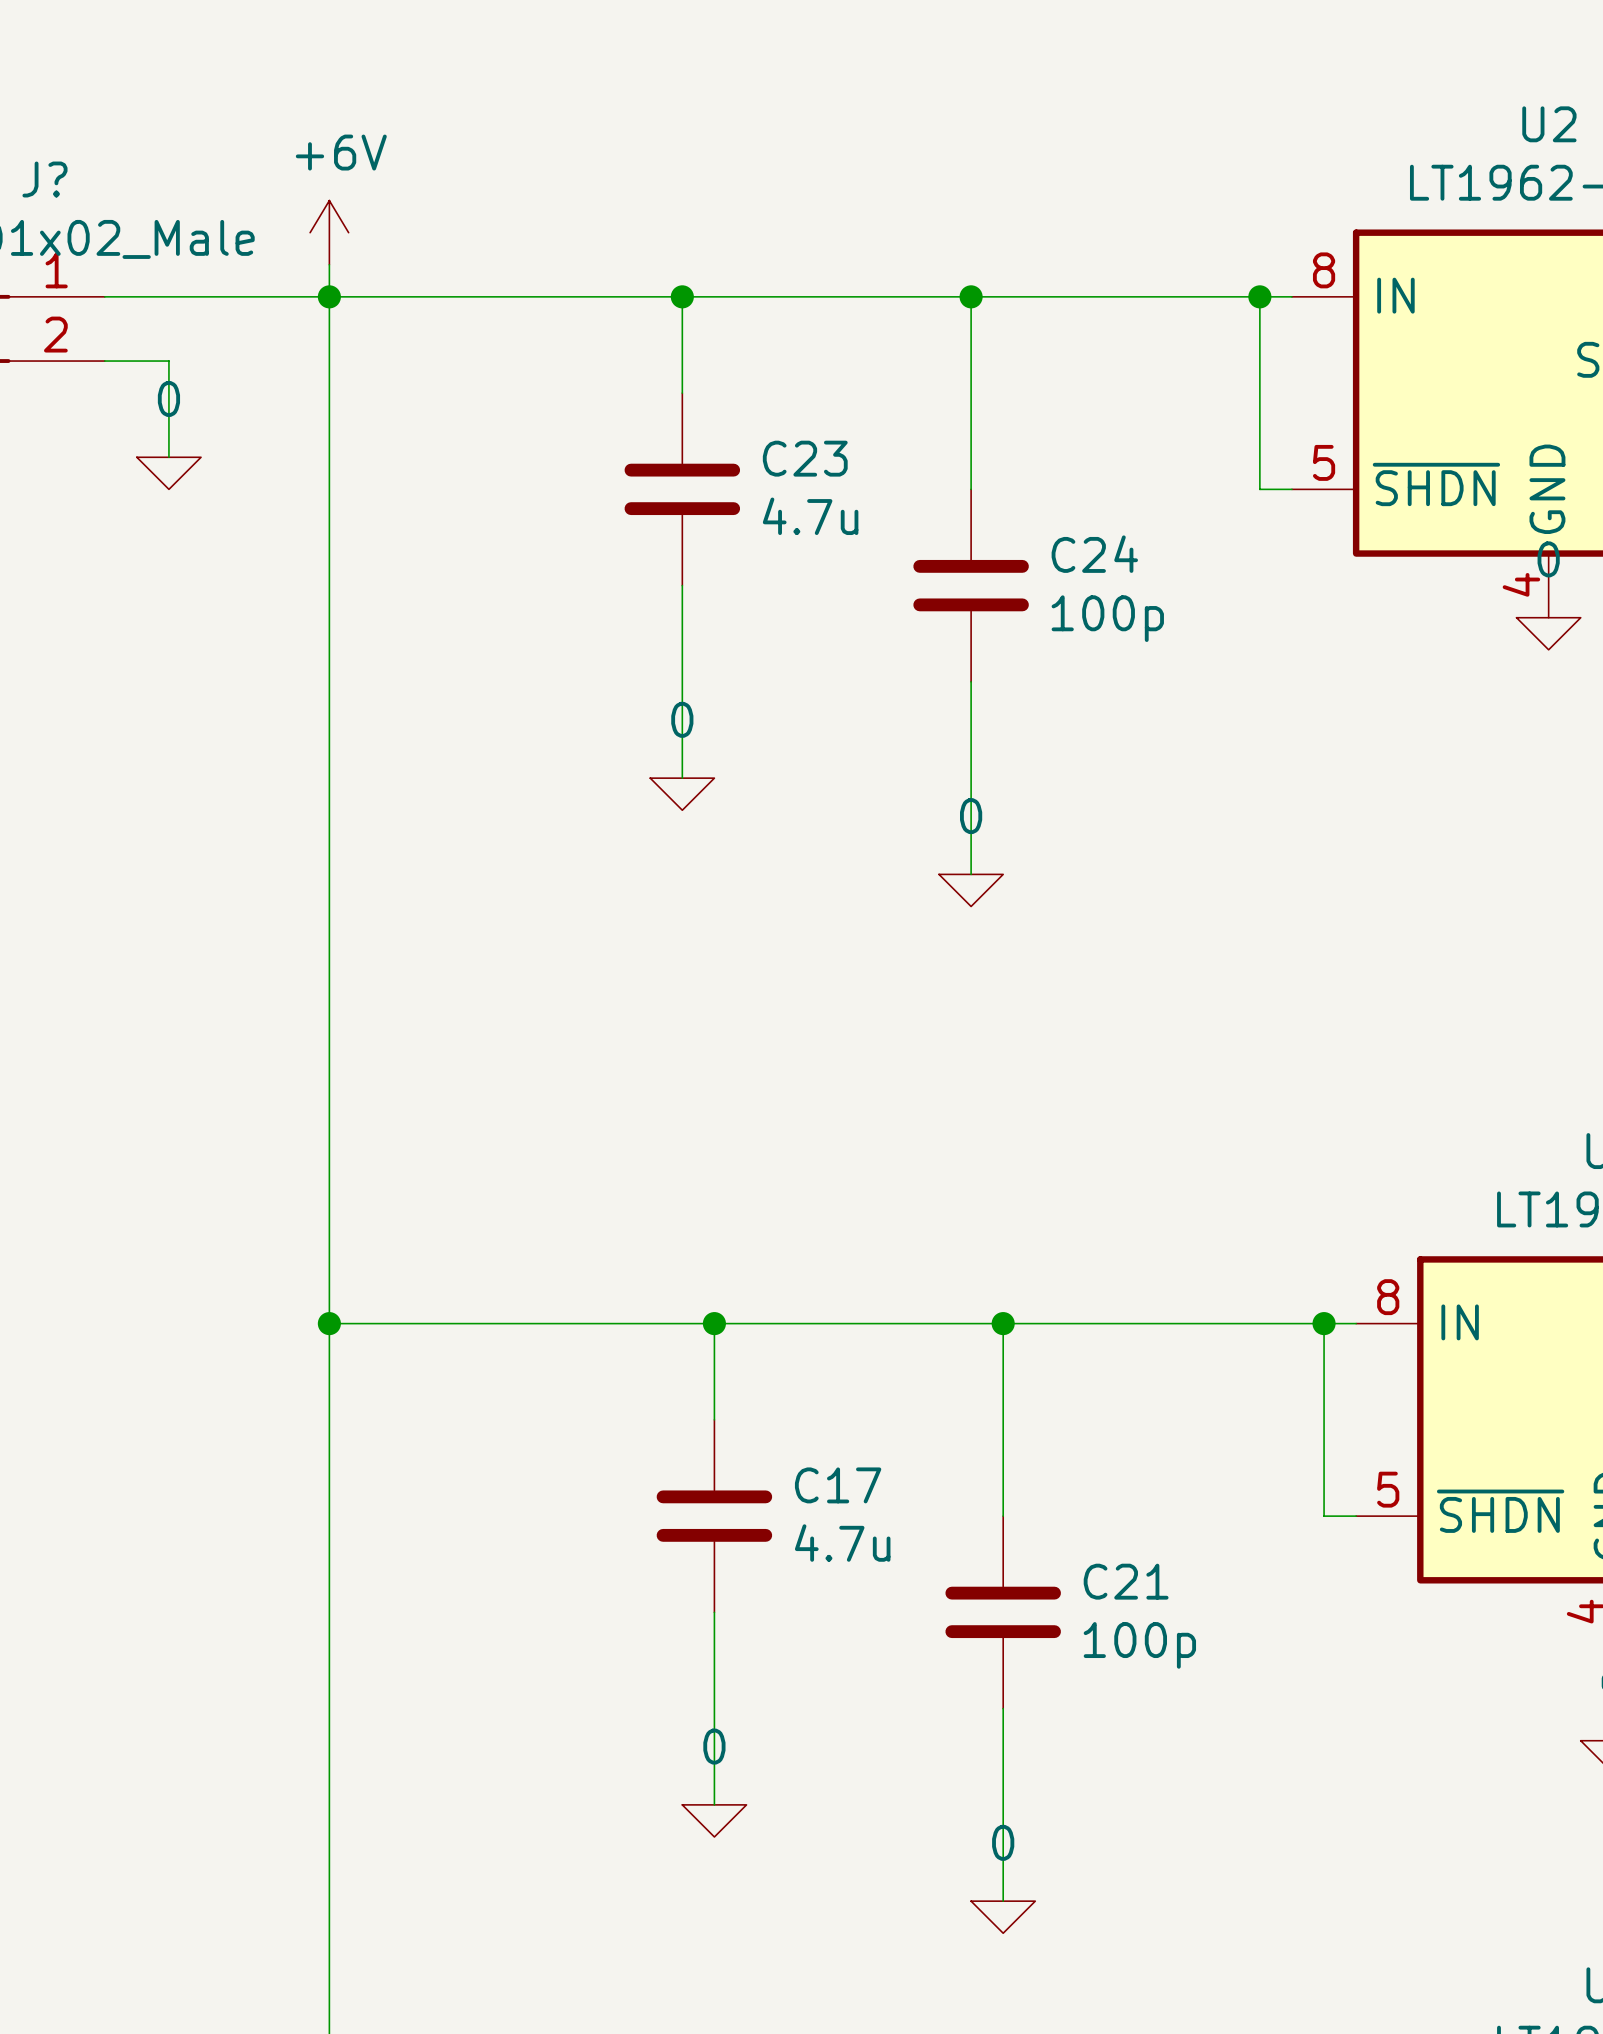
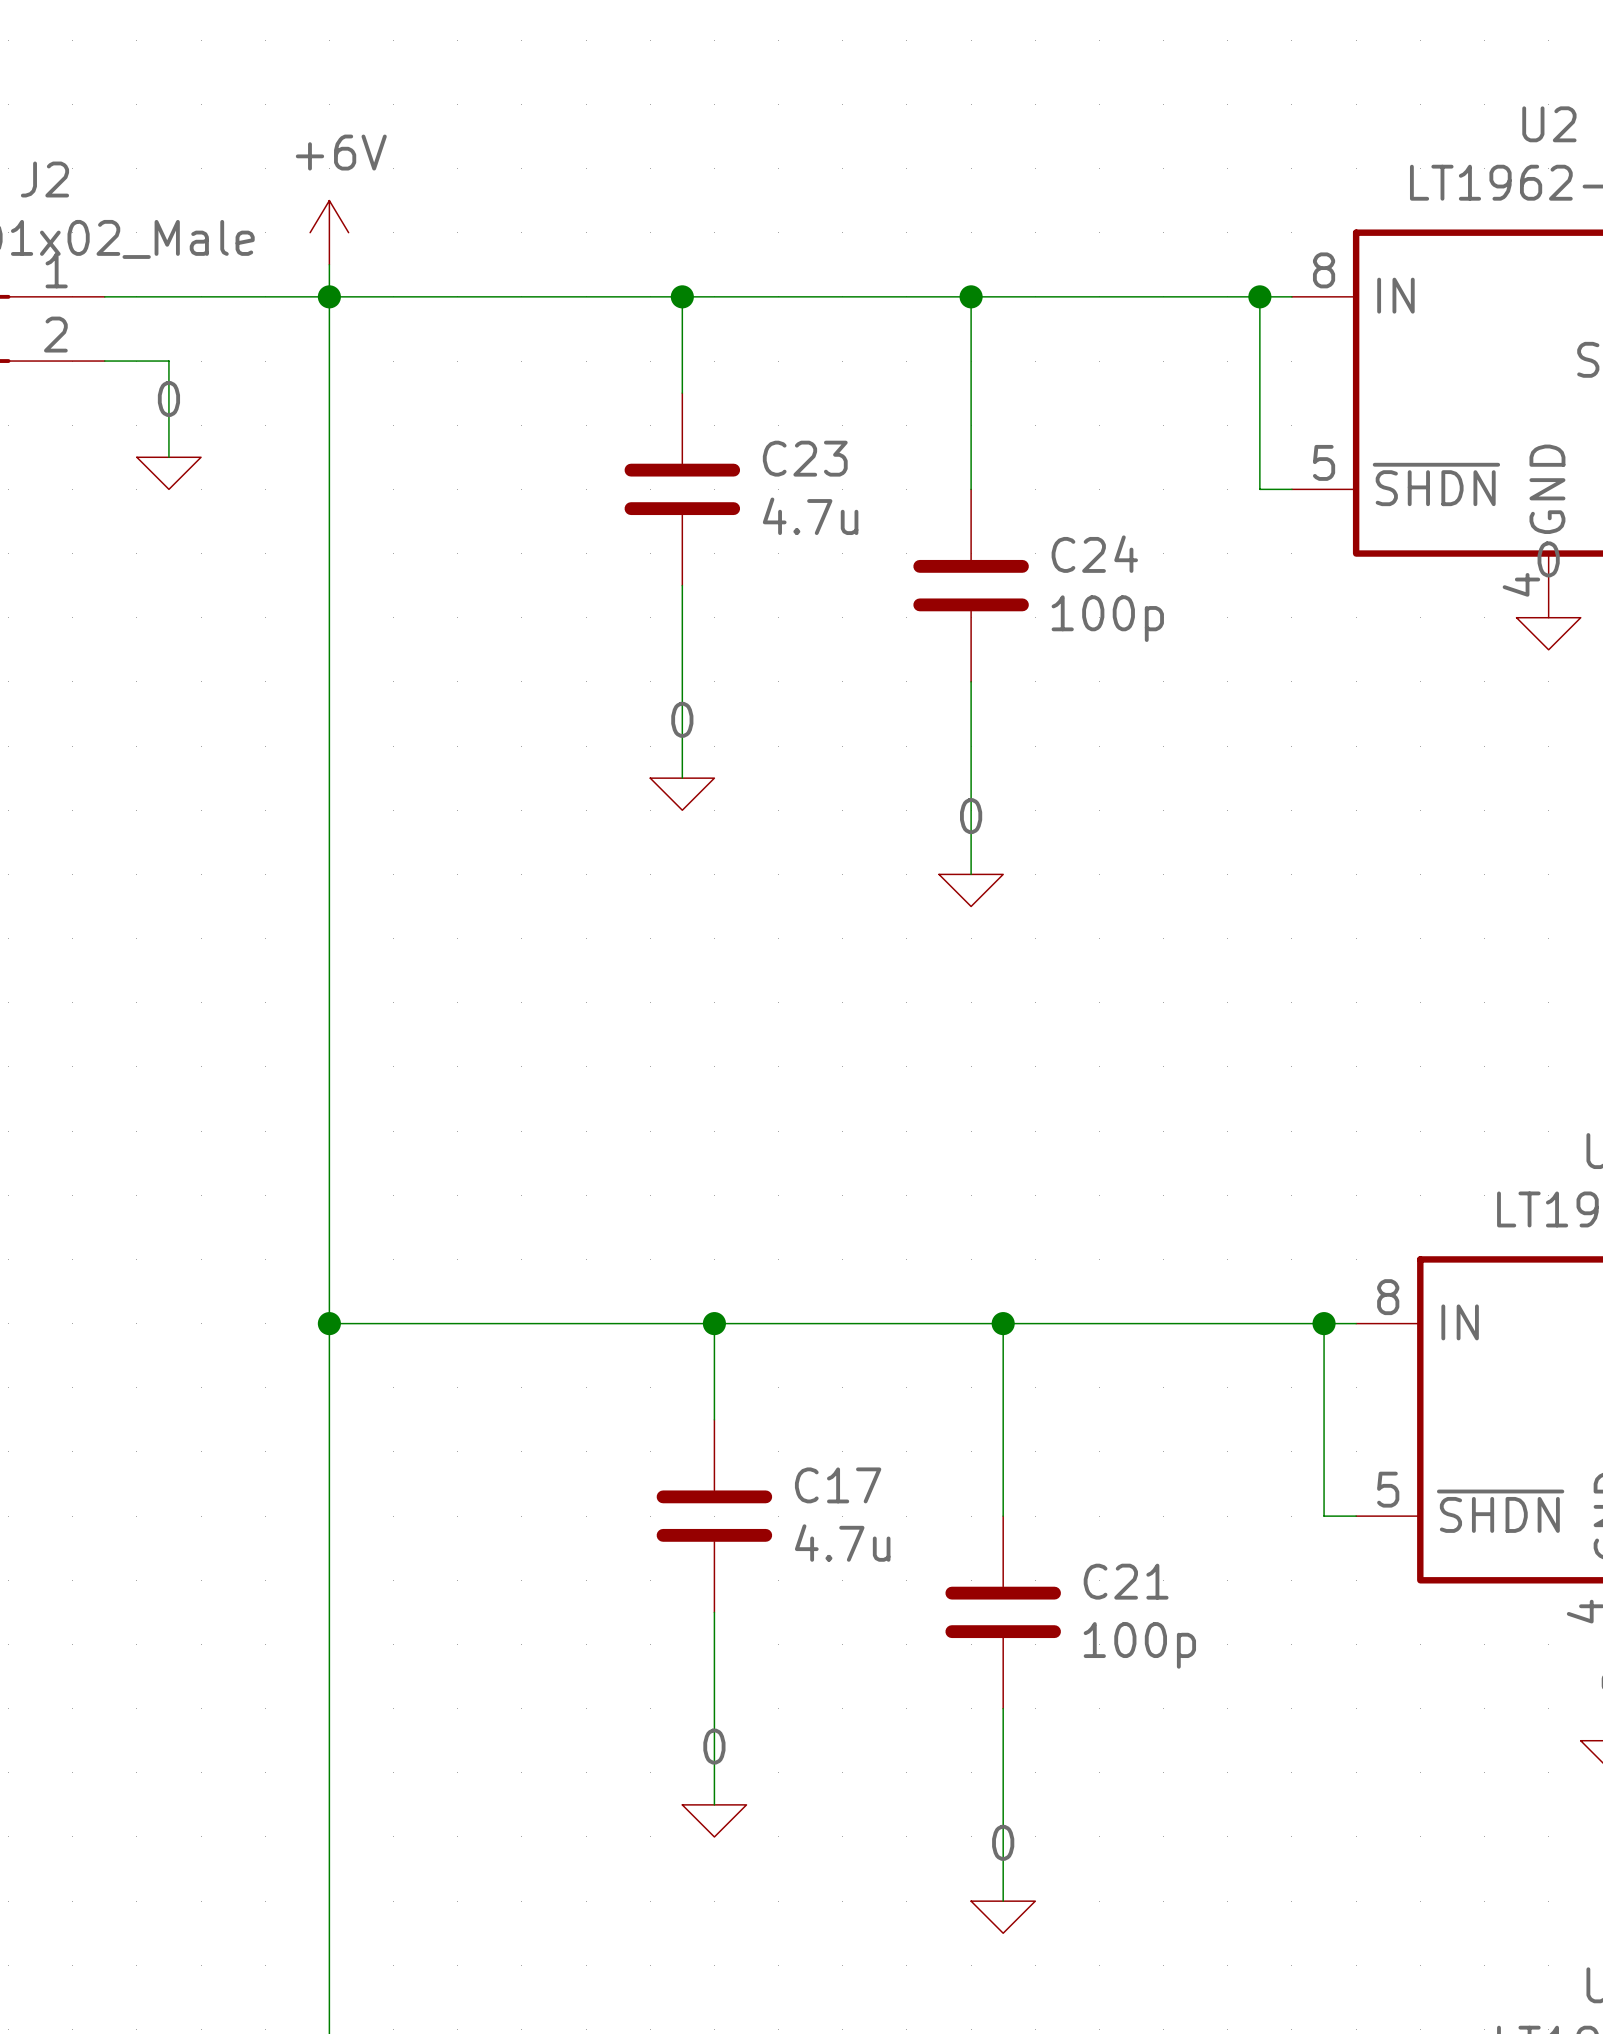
J? name: J? (44, 179) -> J2 (44, 179)

